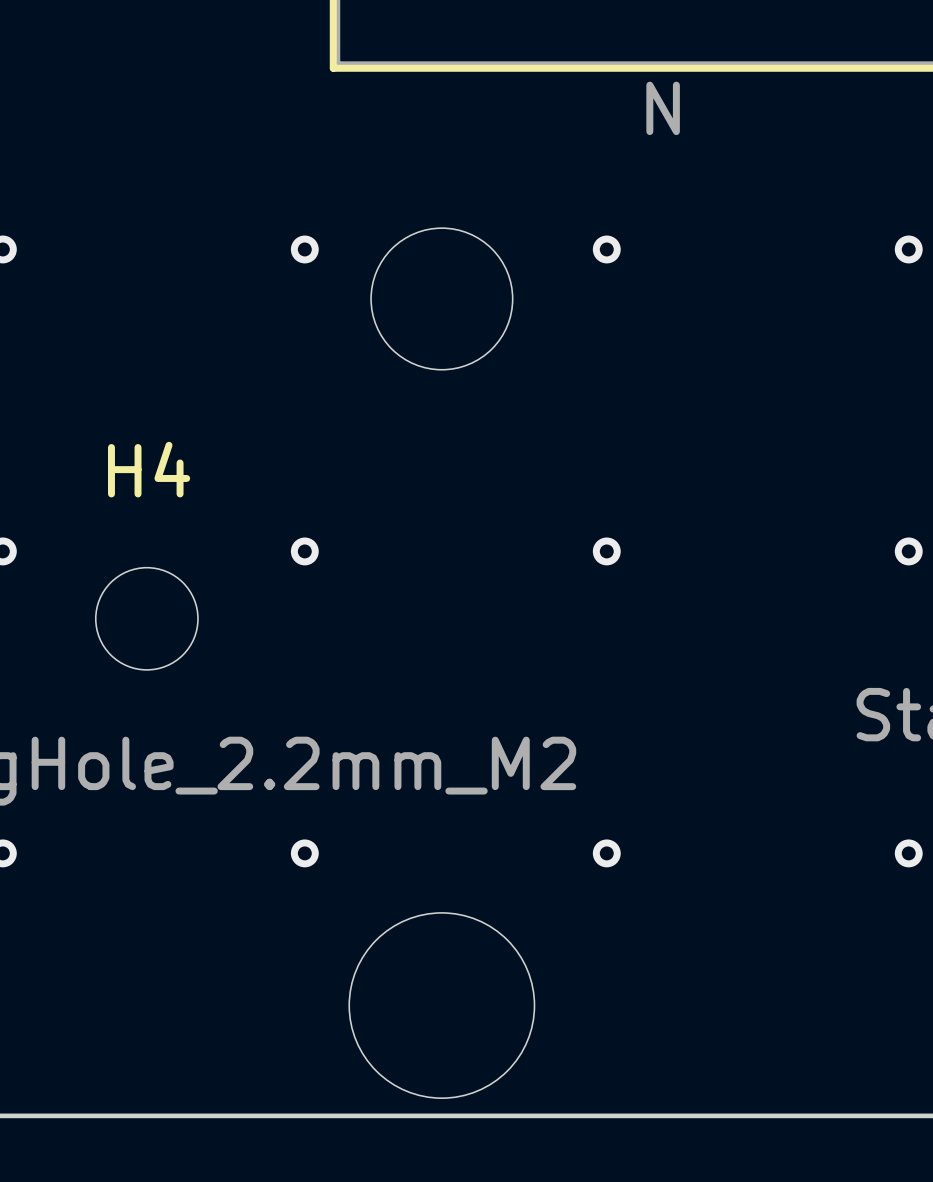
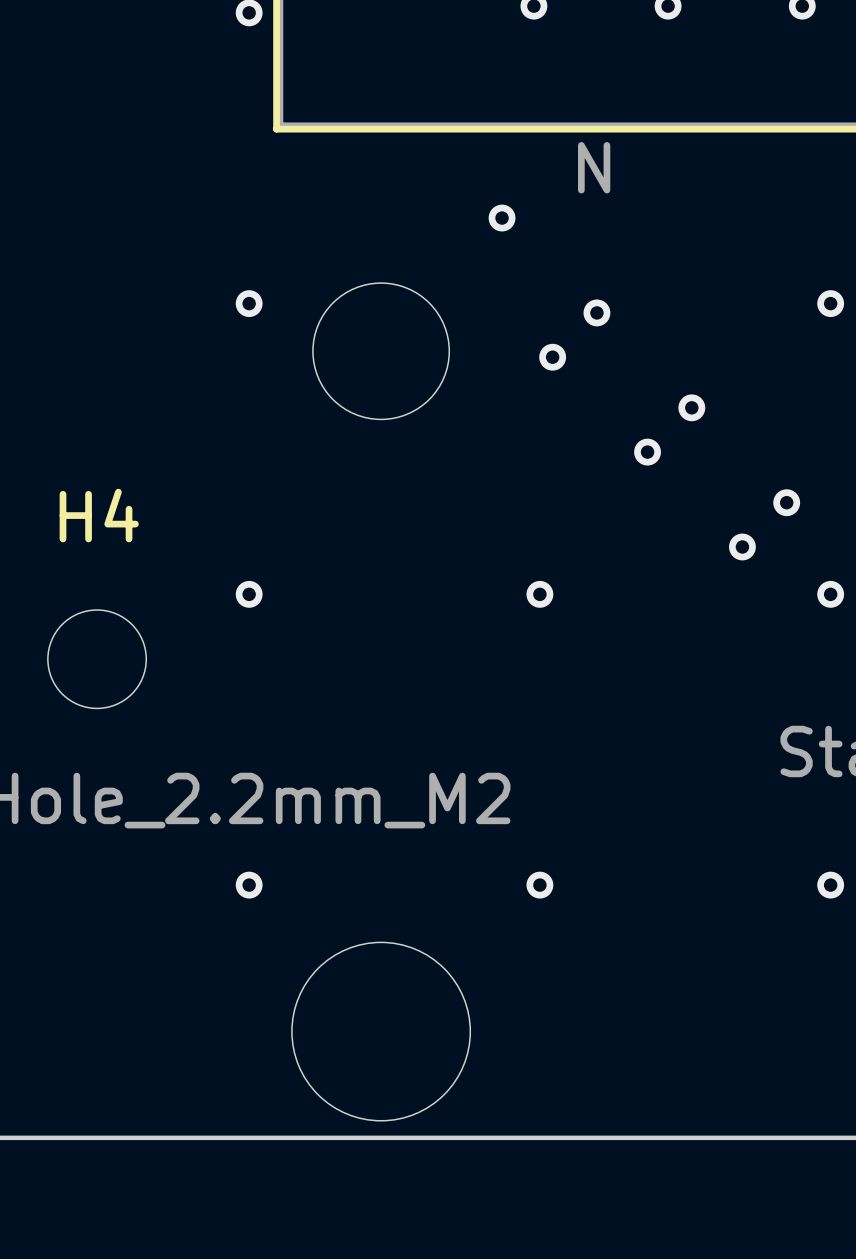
via: none -> (502, 218)
via: (606, 249) -> none
via: none -> (596, 312)
via: none -> (552, 357)
via: none -> (691, 407)
via: none -> (647, 452)
via: none -> (786, 502)
via: none -> (742, 546)

